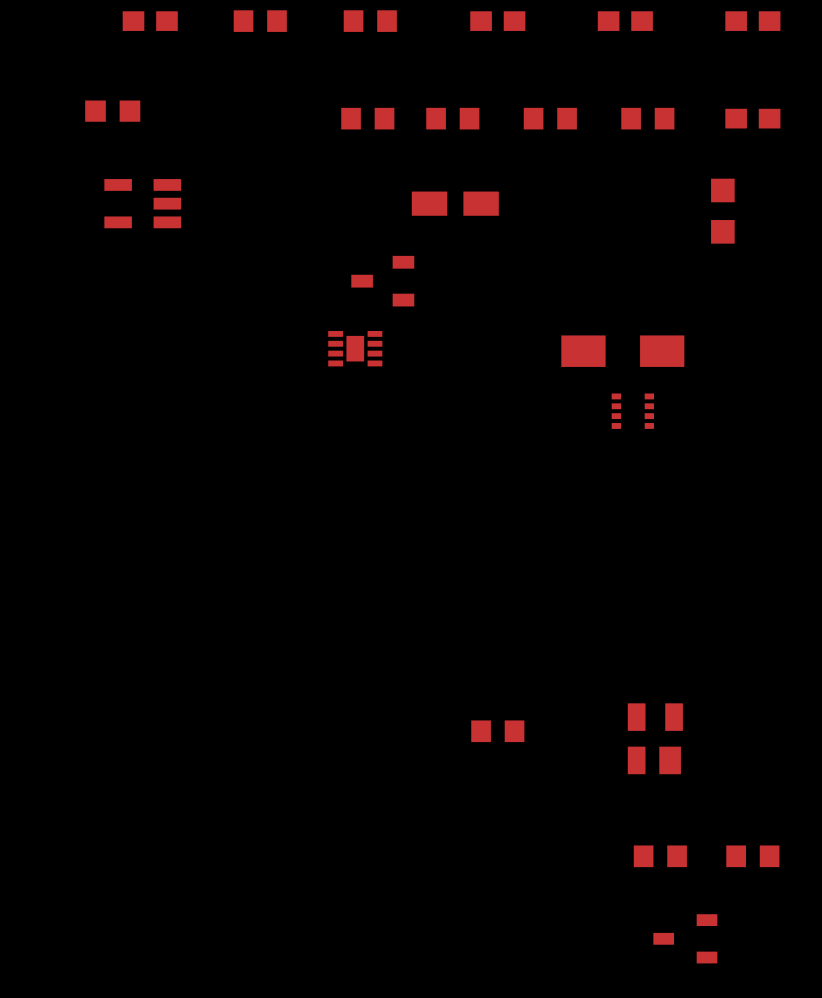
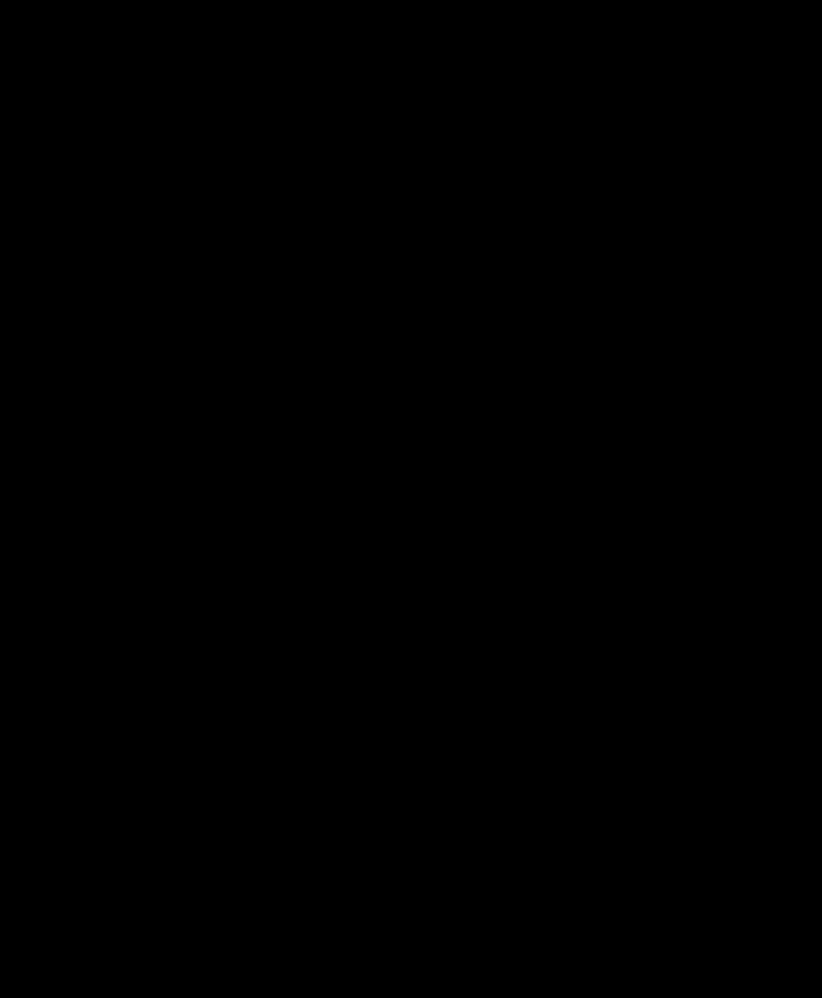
part: (150, 21) -> none
part: (260, 21) -> none
part: (370, 21) -> none
part: (497, 21) -> none
part: (625, 21) -> none
part: (752, 21) -> none
part: (112, 111) -> none
part: (367, 118) -> none
part: (452, 118) -> none
part: (550, 118) -> none
part: (647, 118) -> none
part: (752, 118) -> none
part: (142, 203) -> none
part: (455, 203) -> none
part: (722, 211) -> none
part: (382, 281) -> none
part: (355, 348) -> none
part: (622, 351) -> none
part: (632, 411) -> none
part: (497, 731) -> none
part: (655, 738) -> none
part: (660, 856) -> none
part: (752, 856) -> none
part: (685, 938) -> none

